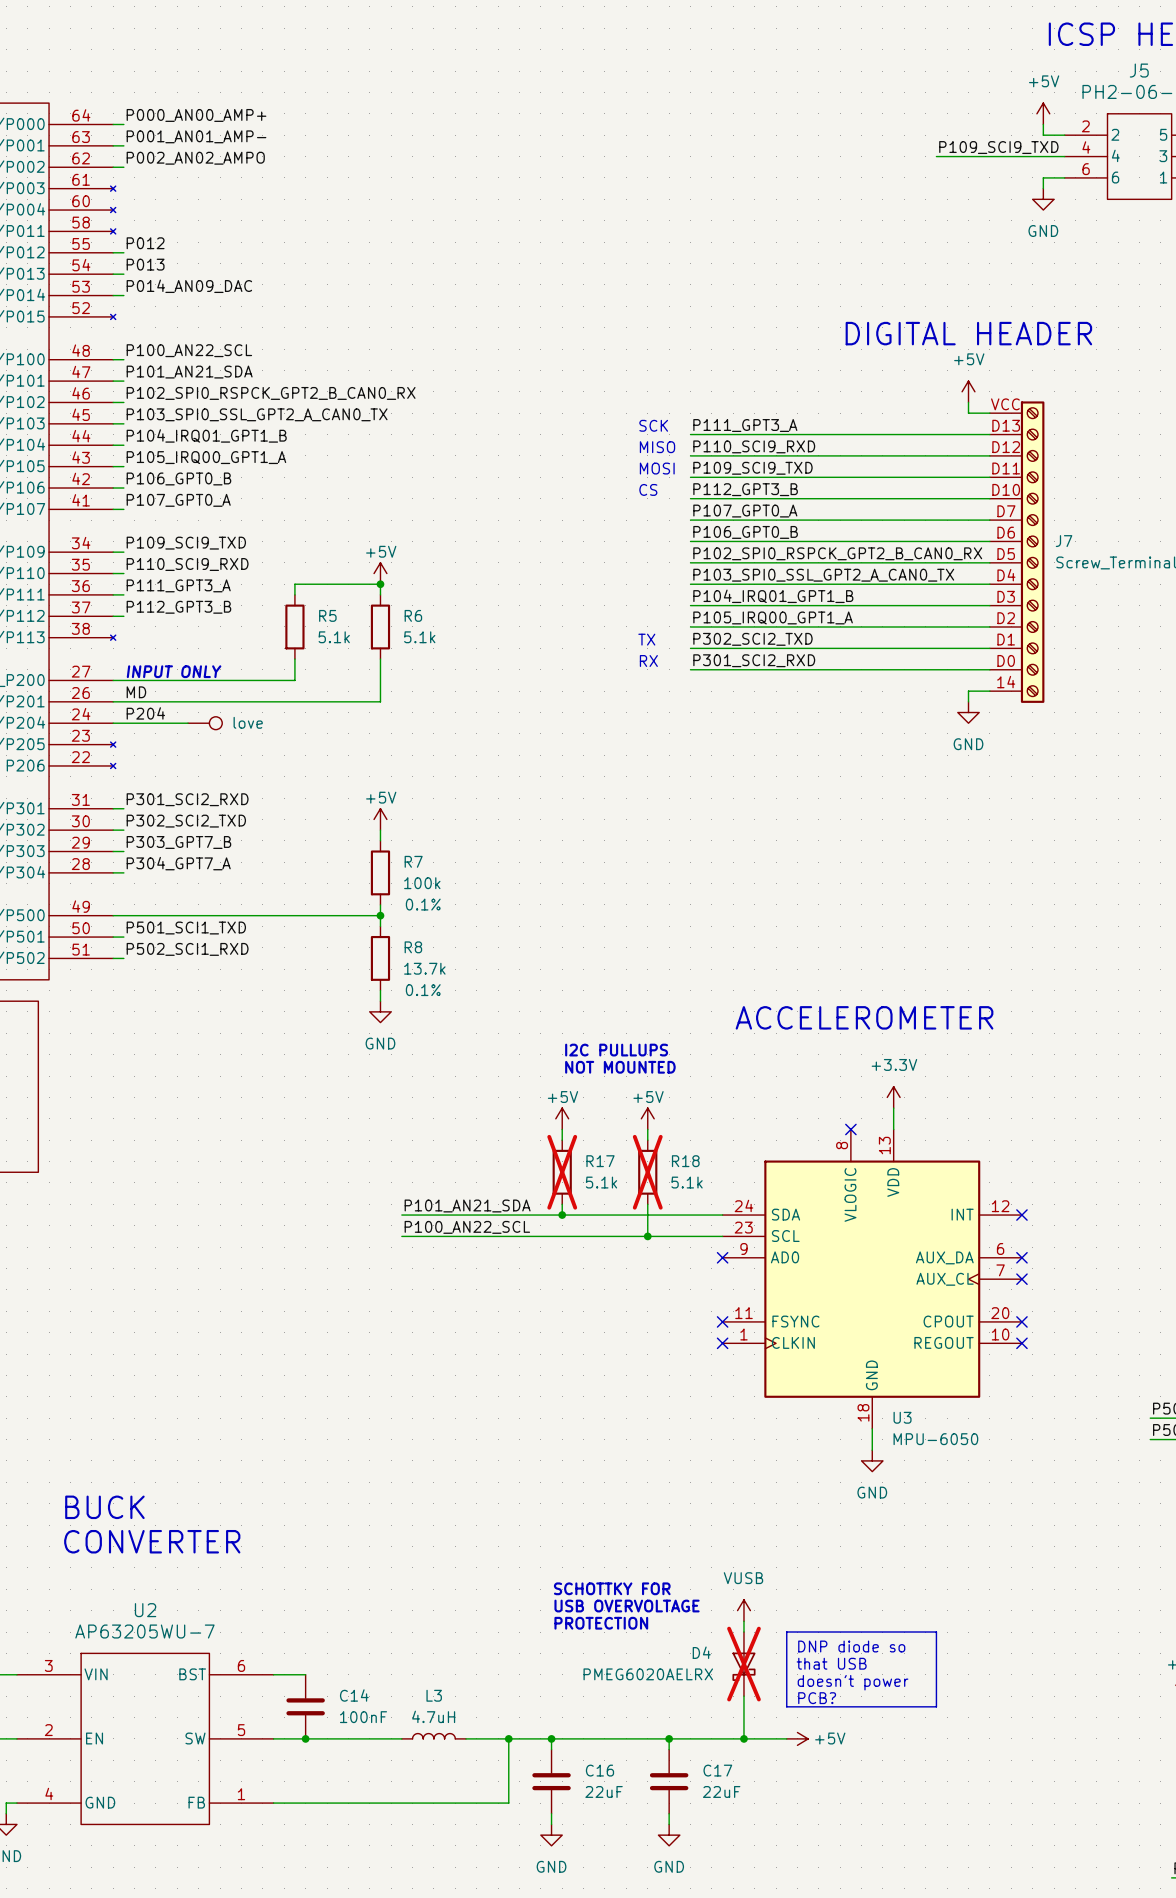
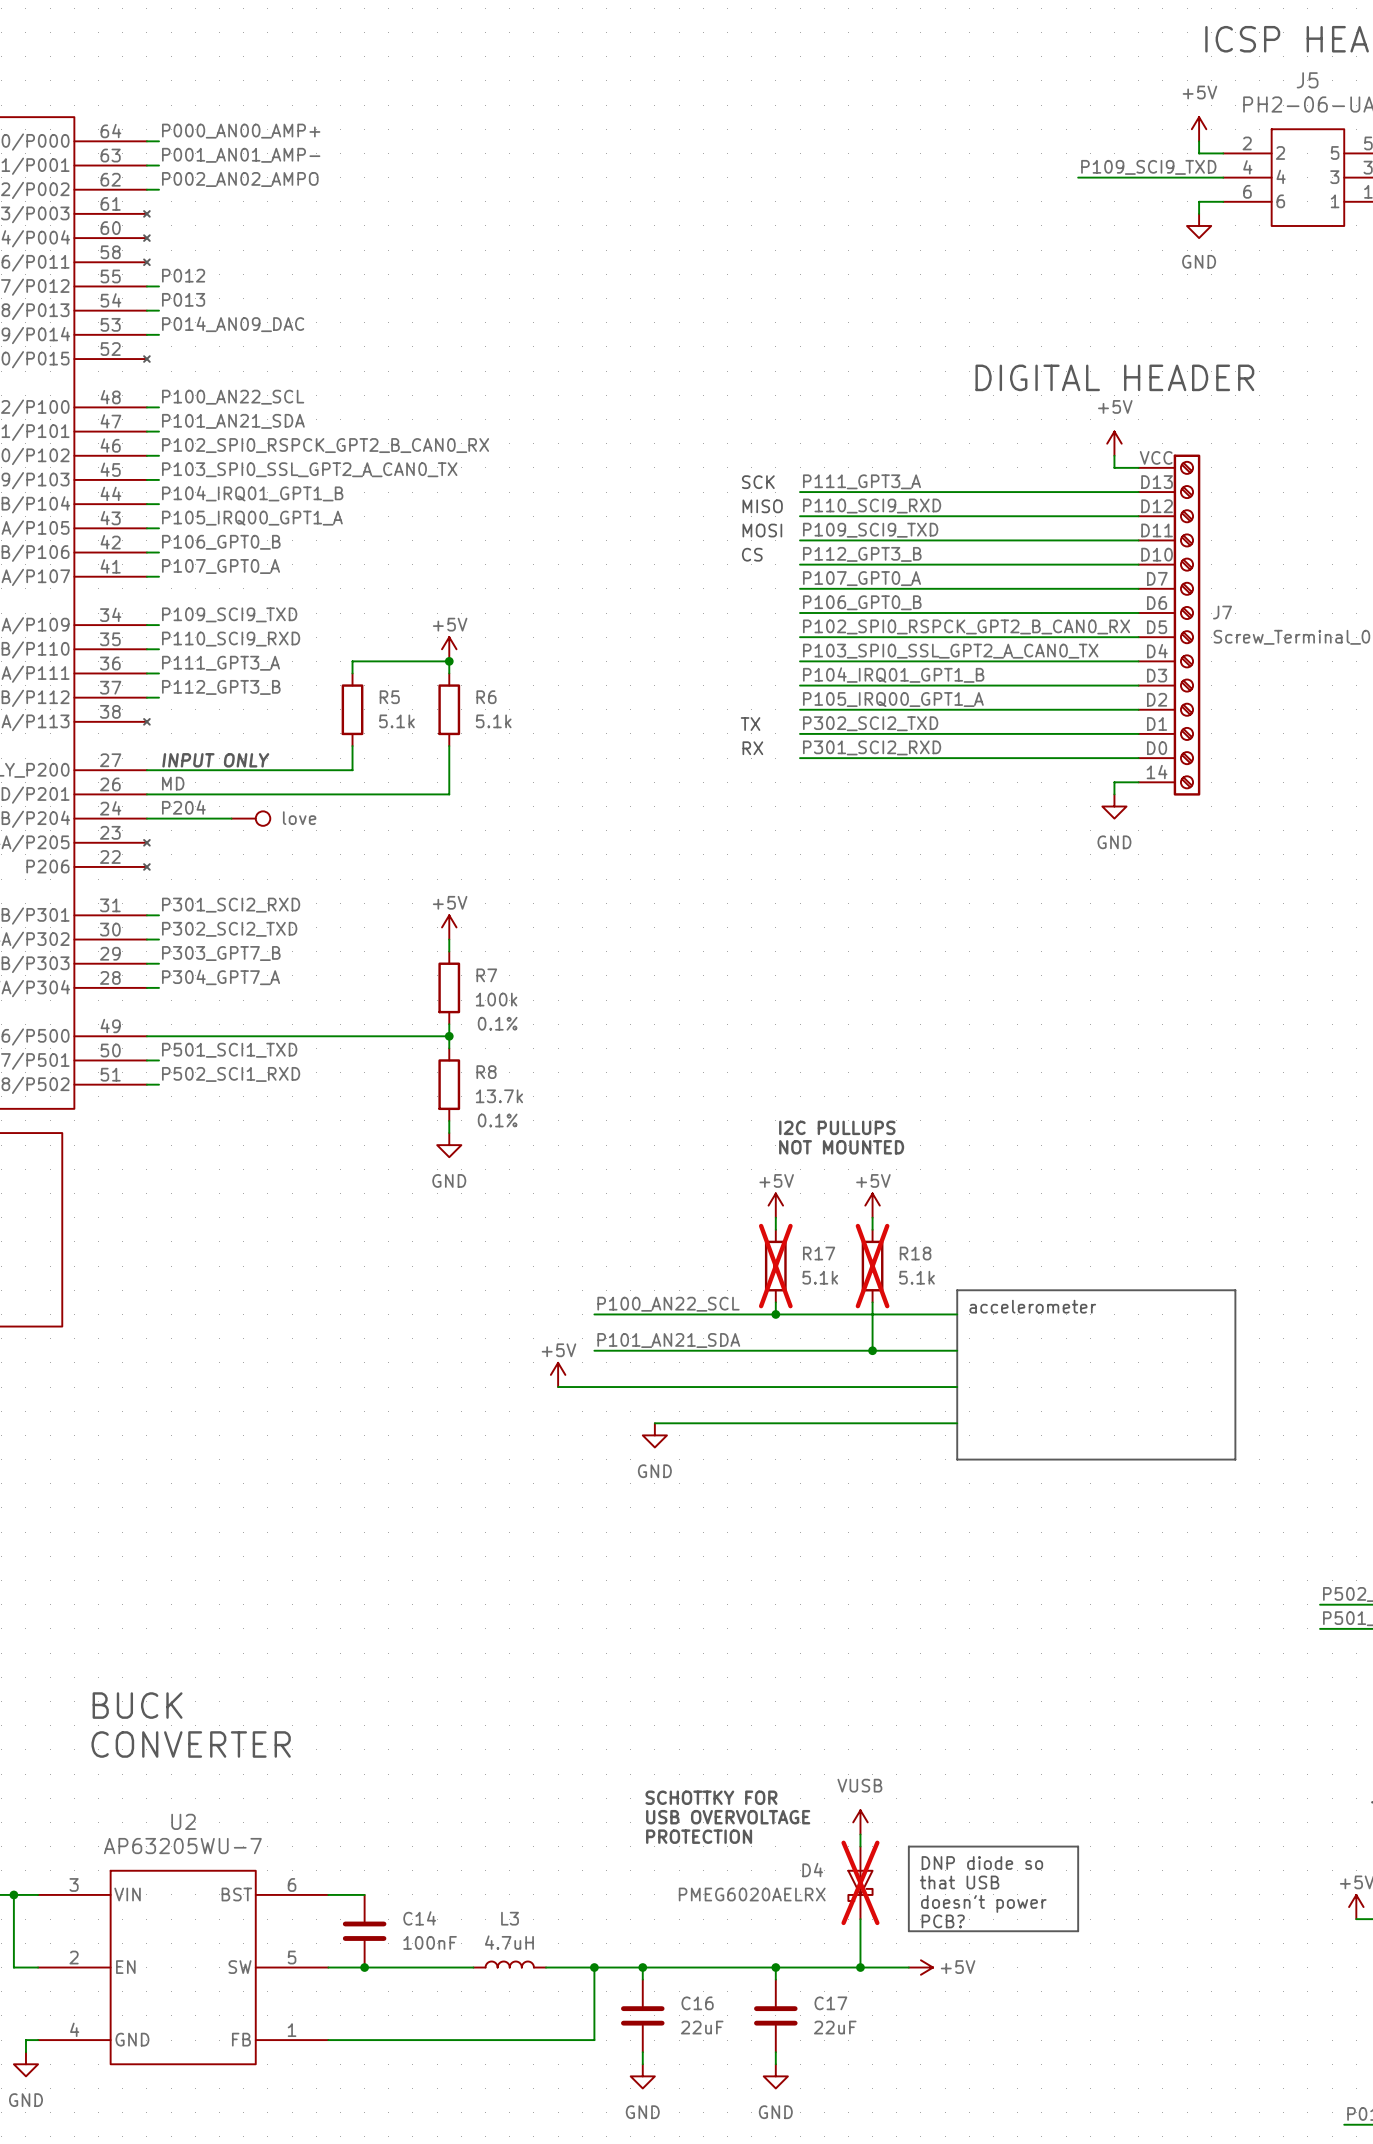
text: ACCELEROMETER (864, 1017) -> none
text position: I2C PULLUPS (616, 1050) -> I2C PULLUPS (837, 1127)
power symbol: none -> +5V (872, 1205)
text position: NOT MOUNTED (620, 1067) -> NOT MOUNTED (841, 1147)
power symbol: +3.3V (893, 1097) -> none
wire: (893, 1108) (893, 1129) -> none
power symbol: +5V (562, 1118) -> none
power symbol position: +5V (647, 1118) -> +5V (775, 1205)
wire: (562, 1129) (562, 1140) -> (775, 1217) (775, 1229)
wire: (647, 1129) (647, 1140) -> (872, 1217) (872, 1229)
no-connect mark: (850, 1129) -> none
line: none -> (957, 1290) (1235, 1290) (1235, 1459) (957, 1459) (957, 1290)
wire: none -> (872, 1302) (872, 1350)
text: none -> accelerometer (1032, 1306)
junction: none -> (775, 1314)
R17 position: (562, 1172) -> (775, 1266)
R18 position: (647, 1172) -> (872, 1266)
junction: none -> (872, 1350)
wire: (562, 1204) (562, 1215) -> (775, 1302) (775, 1314)
wire: (647, 1204) (647, 1236) -> none
label position: P101_AN21_SDA (467, 1205) -> P101_AN21_SDA (668, 1340)
wire: (401, 1215) (722, 1215) -> (594, 1314) (957, 1314)
power symbol: none -> +5V (558, 1374)
junction: (562, 1215) -> none
no-connect mark: (1021, 1215) -> none
wire: none -> (558, 1387) (957, 1387)
label position: P100_AN22_SCL (467, 1227) -> P100_AN22_SCL (668, 1304)
wire: (401, 1236) (722, 1236) -> (594, 1350) (957, 1350)
junction: (647, 1236) -> none
wire: none -> (654, 1423) (957, 1423)
no-connect mark: (722, 1257) -> none
no-connect mark: (1021, 1257) -> none
power symbol: none -> GND (654, 1435)
U3: MPU-6050 (872, 1279) -> none
no-connect mark: (1021, 1279) -> none
no-connect mark: (722, 1321) -> none
no-connect mark: (1021, 1321) -> none
no-connect mark: (722, 1343) -> none
no-connect mark: (1021, 1343) -> none
wire: (872, 1428) (872, 1450) -> none
power symbol: GND (872, 1460) -> none

